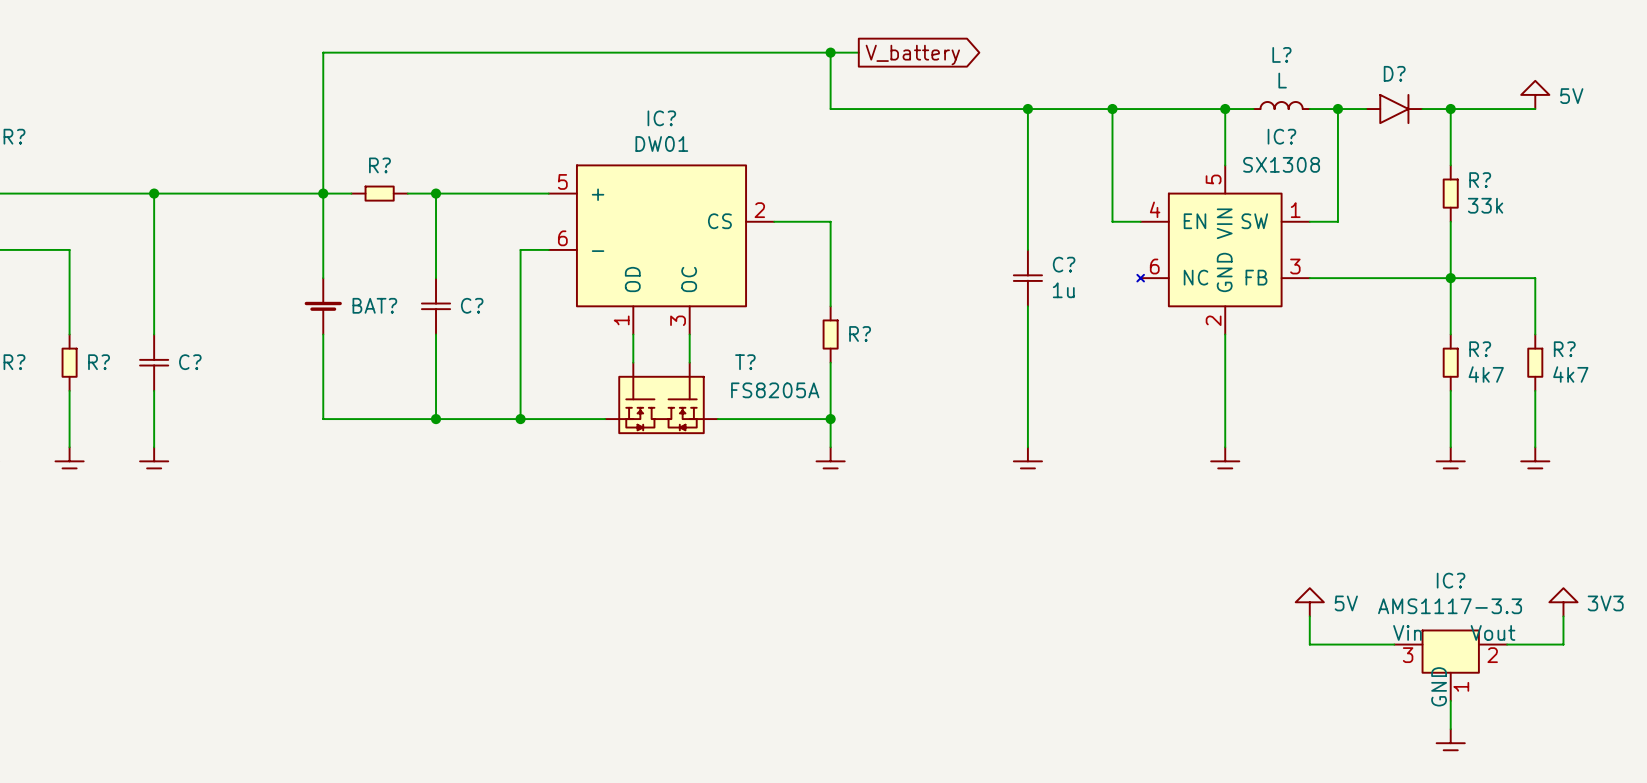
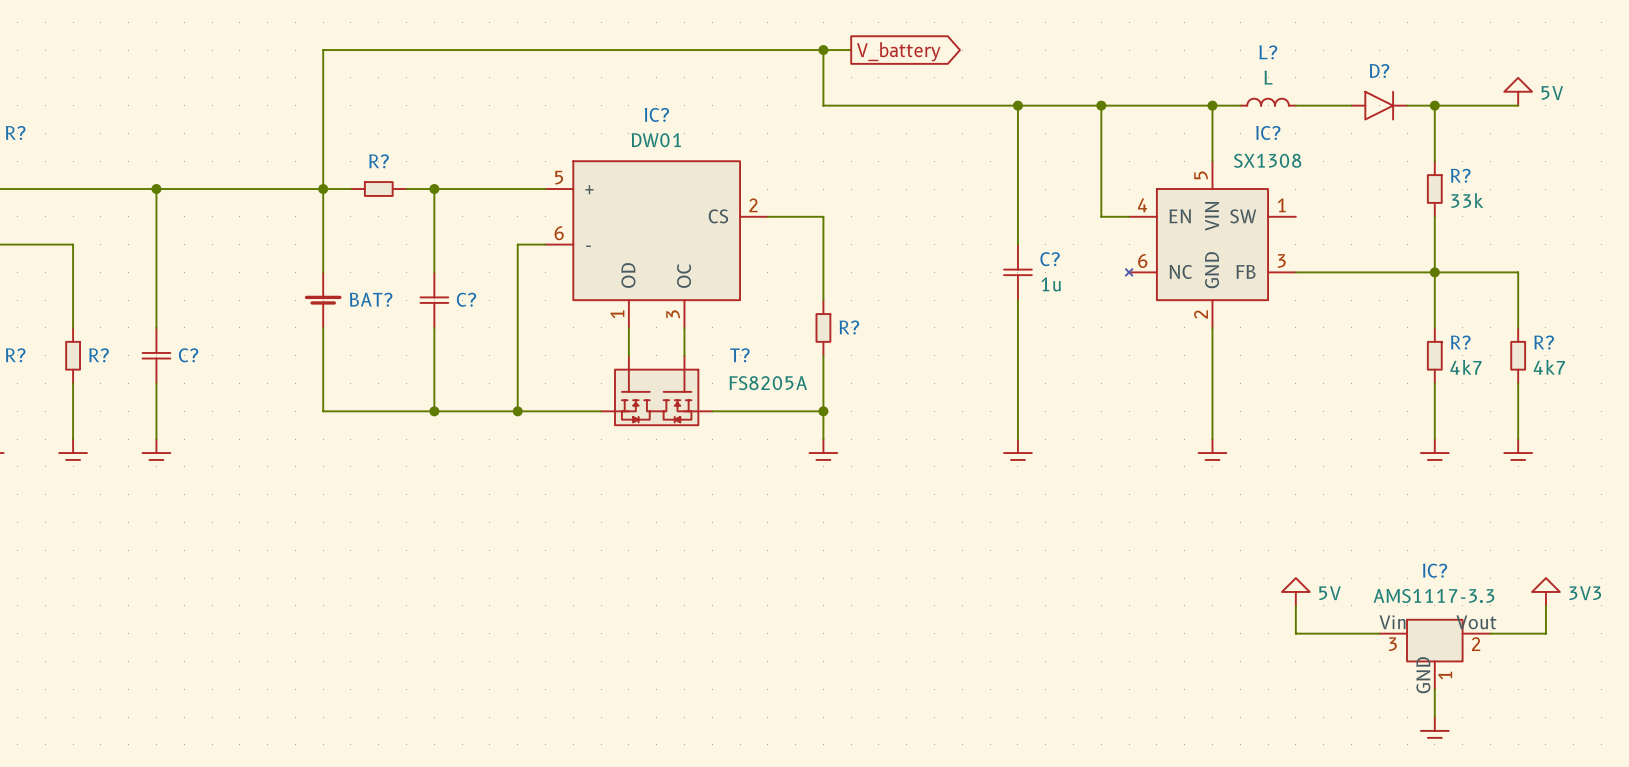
wire: (1337, 109) (1337, 221) (1309, 221) -> none
junction: (1337, 109) -> none

